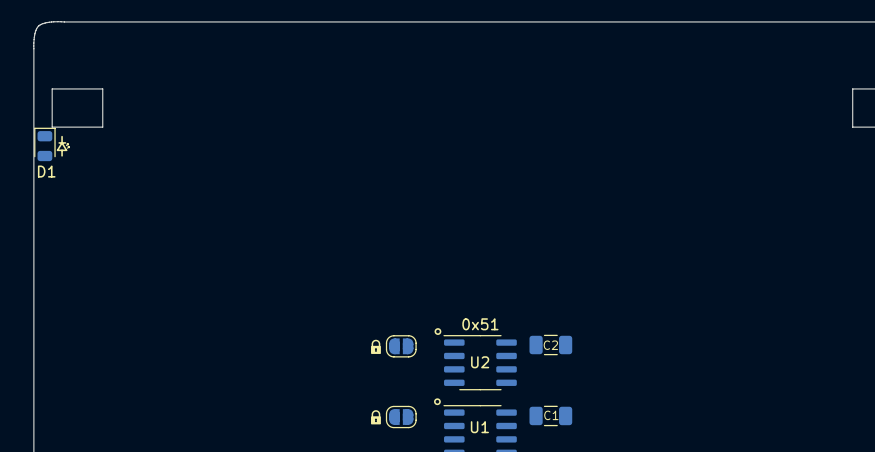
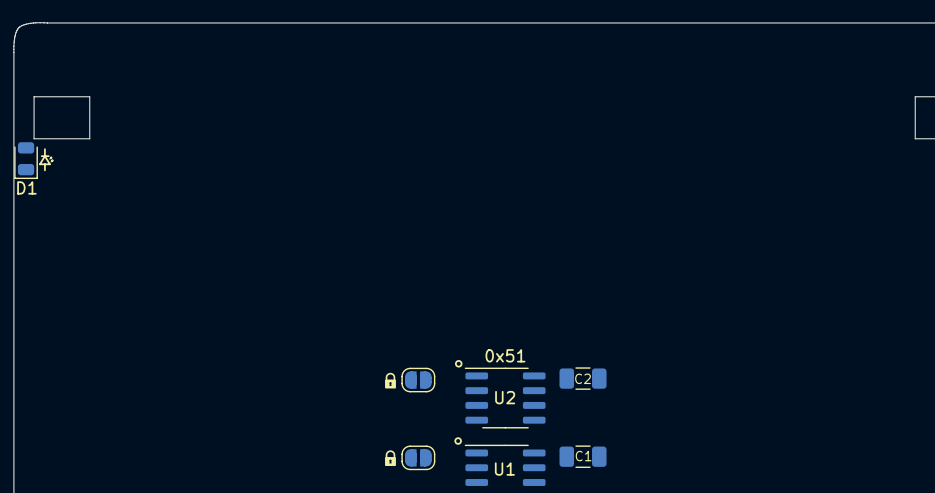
D1 rotation: 0° (44, 144) -> 180° (26, 160)

